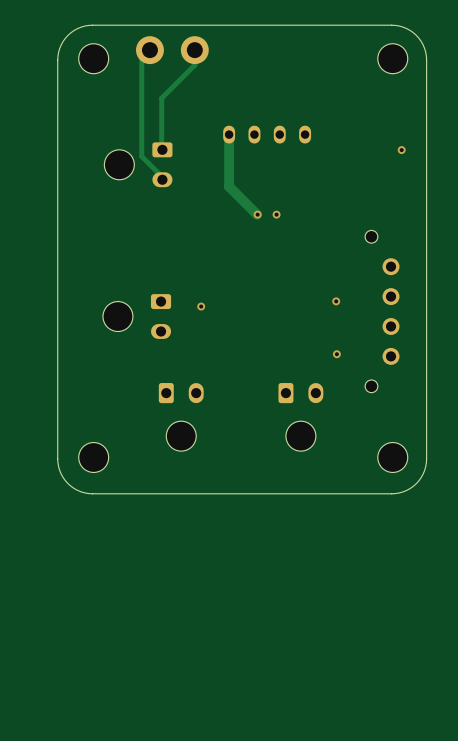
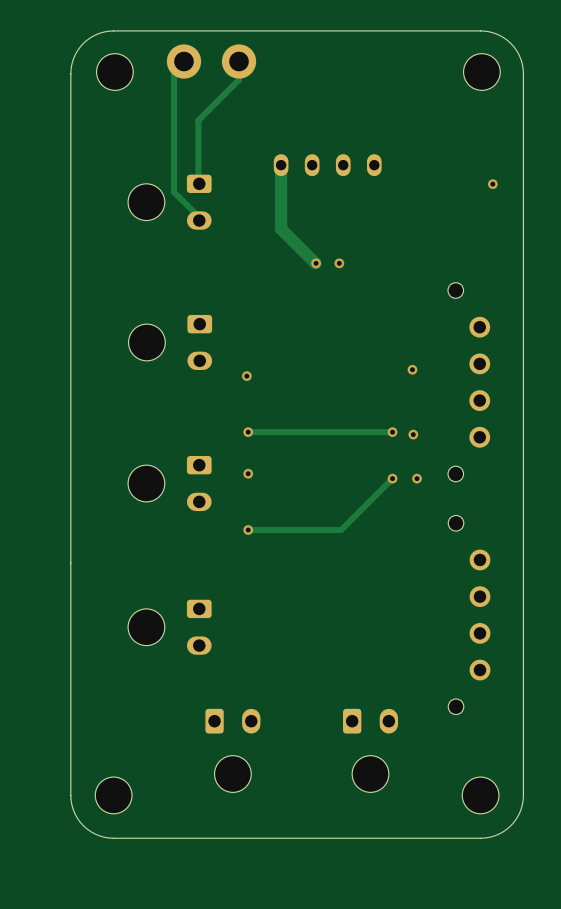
part position: (137, 316) -> (170, 342)
via: none -> (248, 432)
track: none -> (392, 432) (248, 432)
via: none -> (392, 432)
via: none -> (248, 473)
track: none -> (392, 478) (341, 530) (248, 530)
via: none -> (392, 478)
via: none -> (417, 478)
part: none -> (169, 483)
part: (181, 417) -> none
part: (300, 417) -> none
via: none -> (248, 530)
part: (93, 457) -> none
part: (392, 457) -> none
board edge: (426, 458) (424, 470) (416, 483) (406, 490) (391, 493) (88, 493) (77, 490) (65, 480) (59, 470) (57, 458) -> (523, 563) (523, 800) (519, 814) (510, 825) (499, 834) (480, 838) (113, 838) (104, 837) (90, 831) (77, 818) (71, 800) (70, 563)
part: none -> (469, 615)
part: none -> (169, 627)
part: none -> (232, 750)
part: none -> (370, 750)
part: none -> (113, 795)
part: none -> (480, 795)

